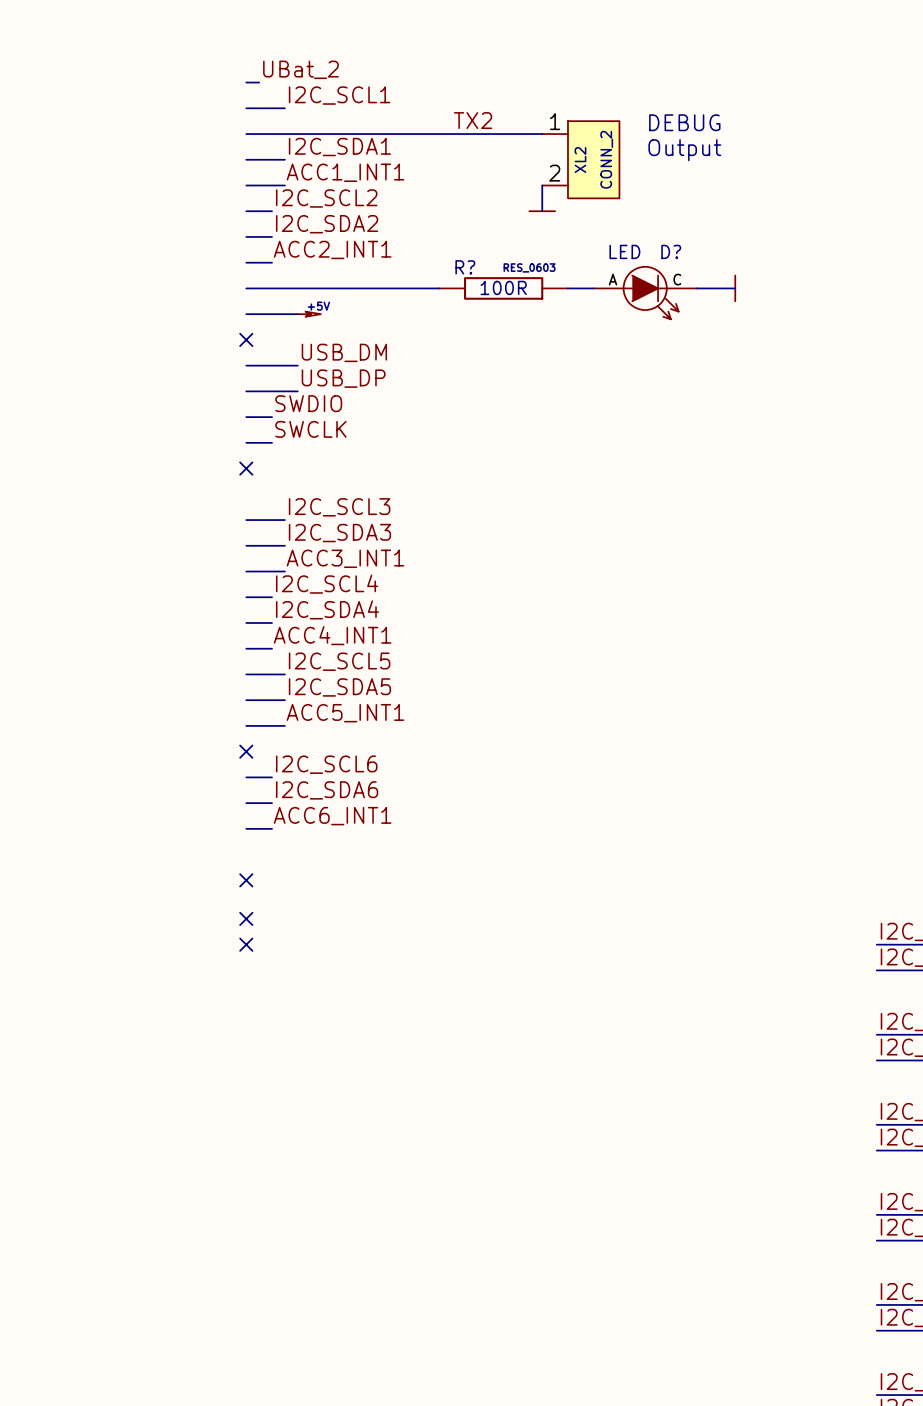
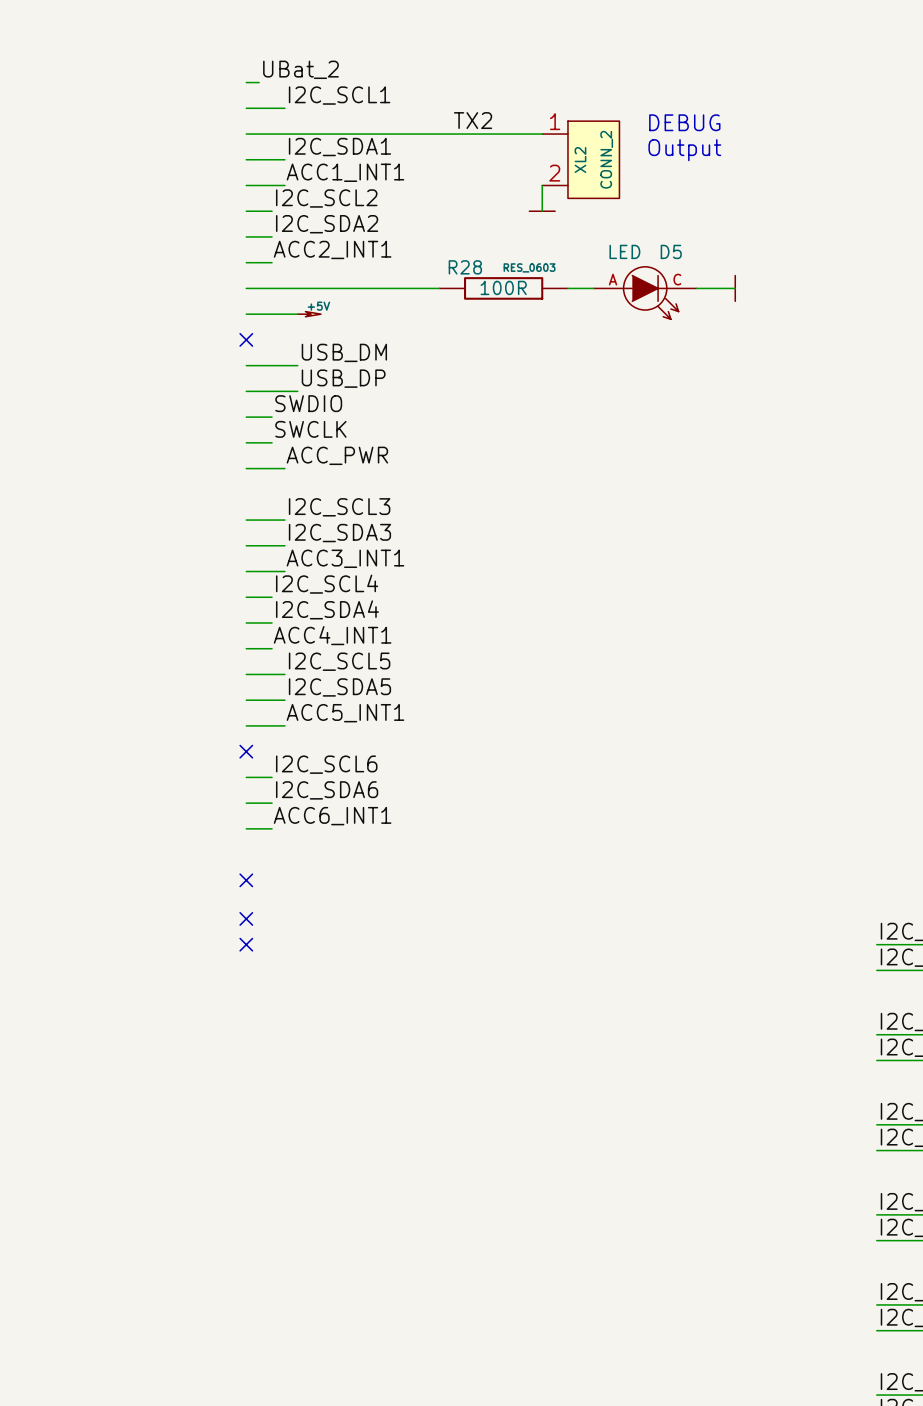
D? name: D? (671, 251) -> D5 (671, 251)
R? name: R? (465, 267) -> R28 (465, 267)
label: none -> ACC_PWR (337, 455)
wire: none -> (246, 468) (284, 468)
no-connect mark: (246, 468) -> none

